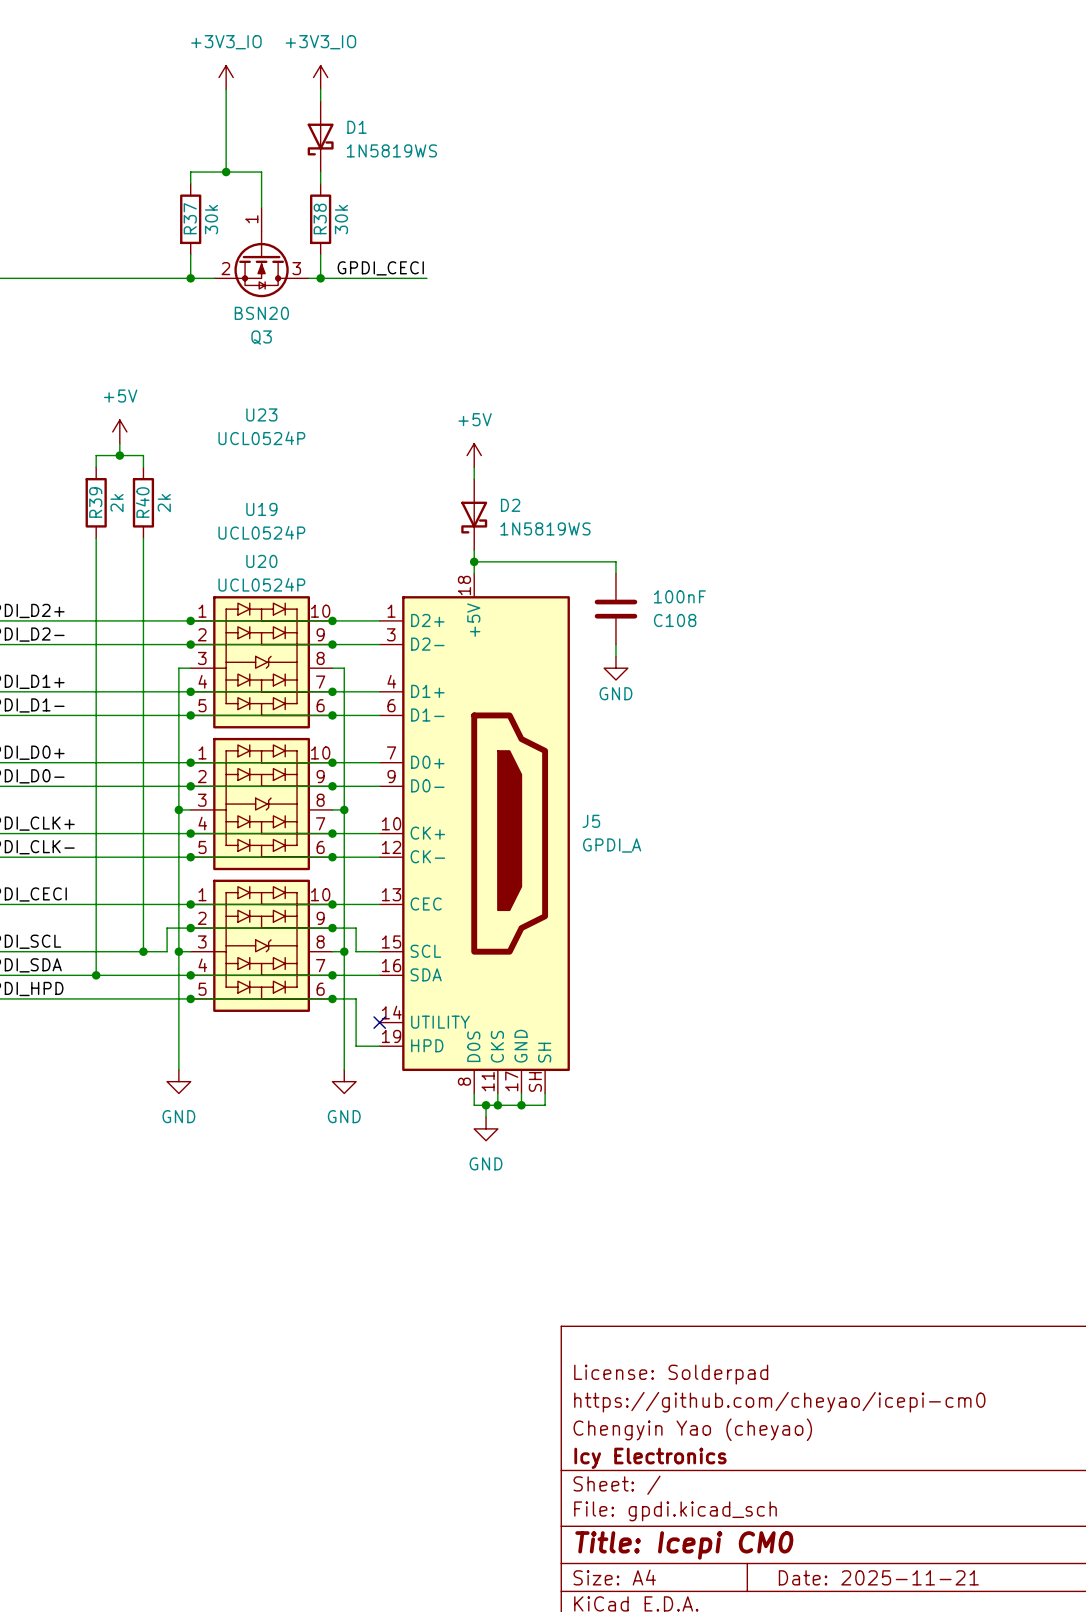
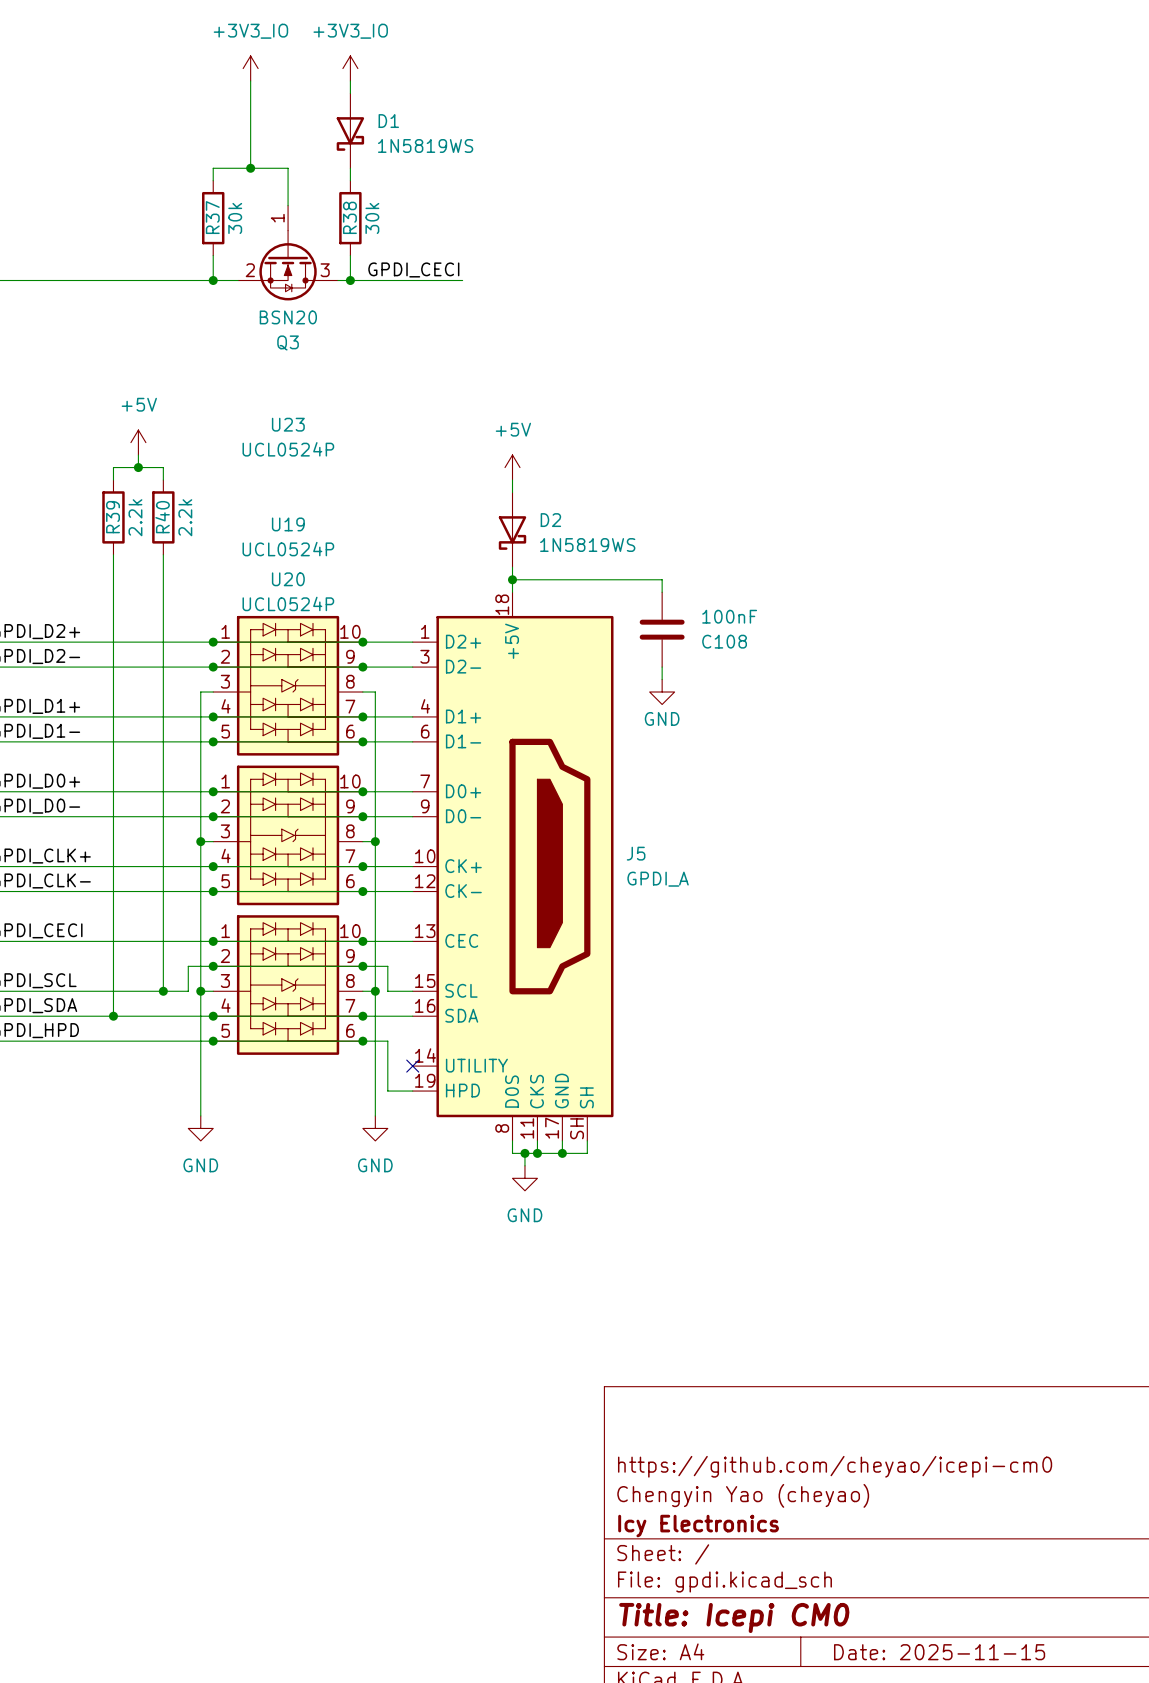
R39 value: 2k (117, 503) -> 2.2k (135, 517)
R40 value: 2k (164, 503) -> 2.2k (185, 517)
title block: License: Solderpad (671, 1374) -> none
title block: Date: 2025-11-21 (878, 1577) -> Date: 2025-11-15 (939, 1652)

